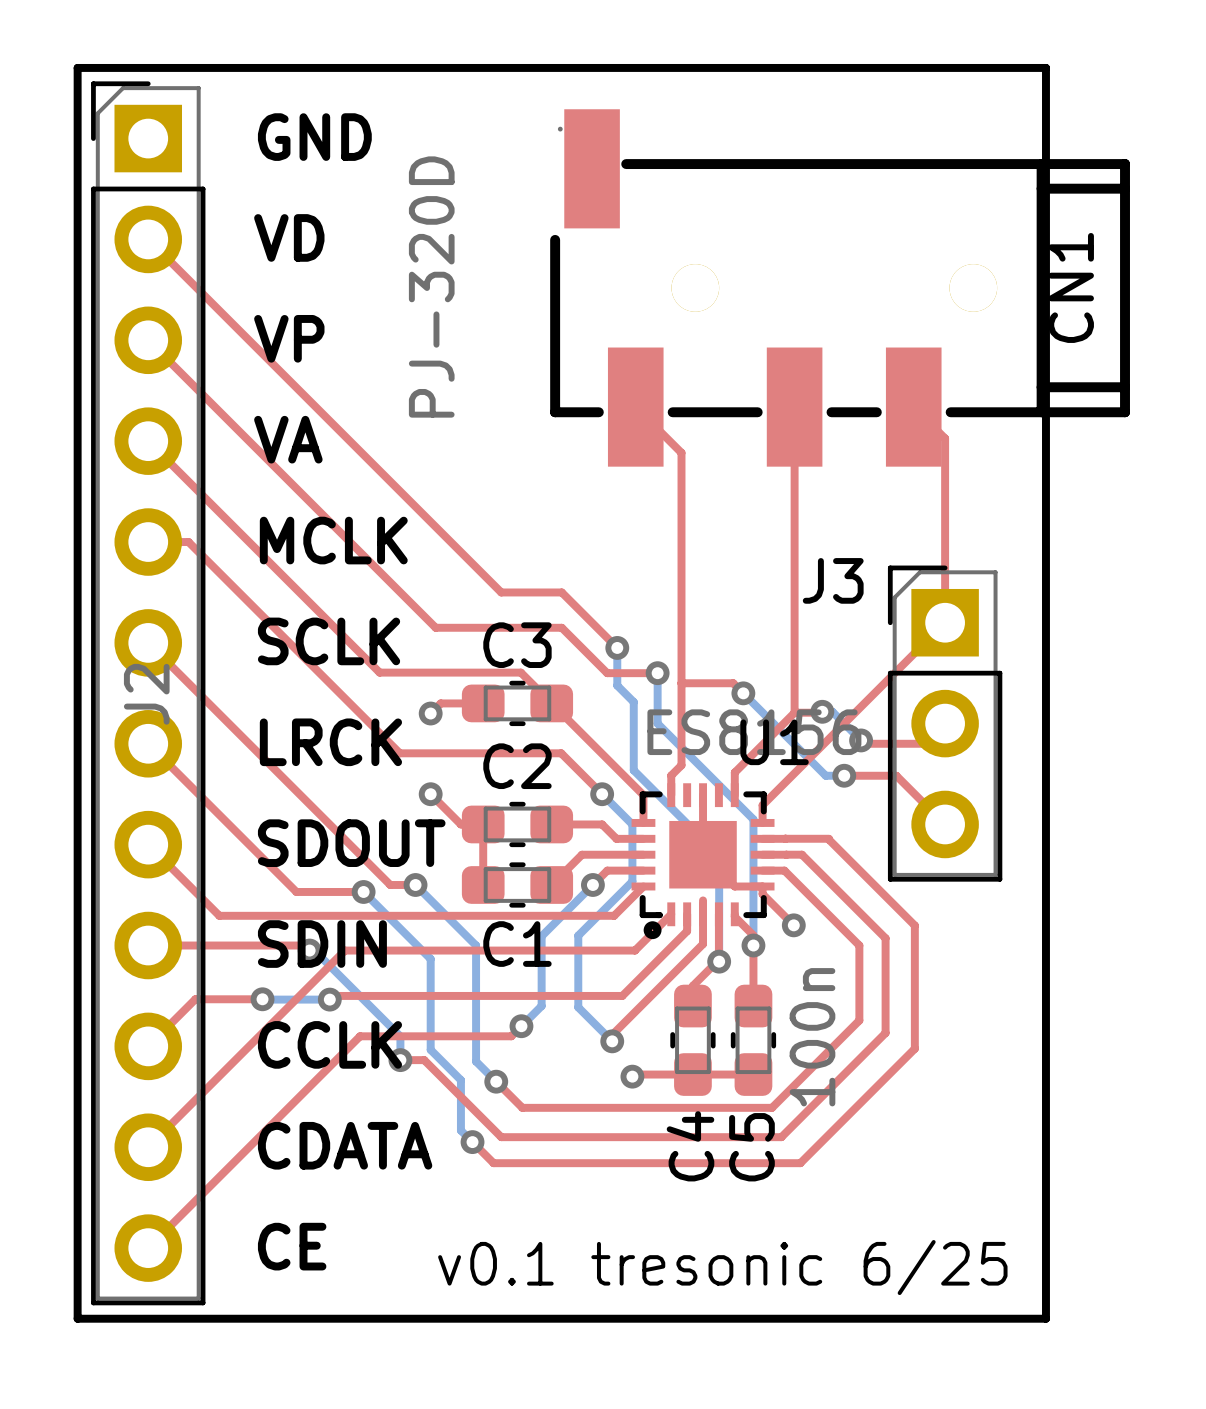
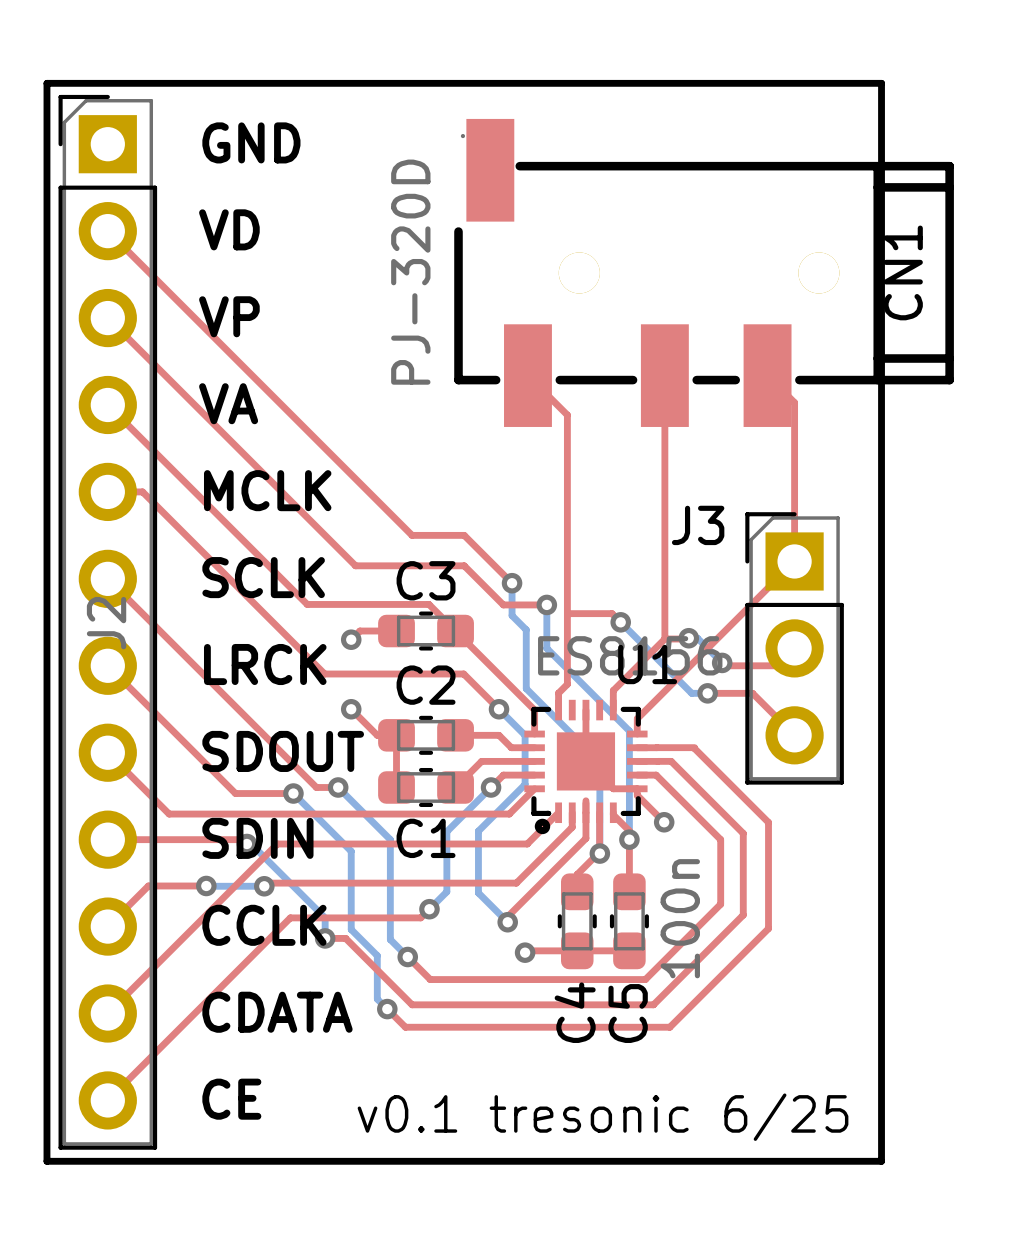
CN1 value position: PJ-320D (431, 287) -> PJ-320D (410, 272)

